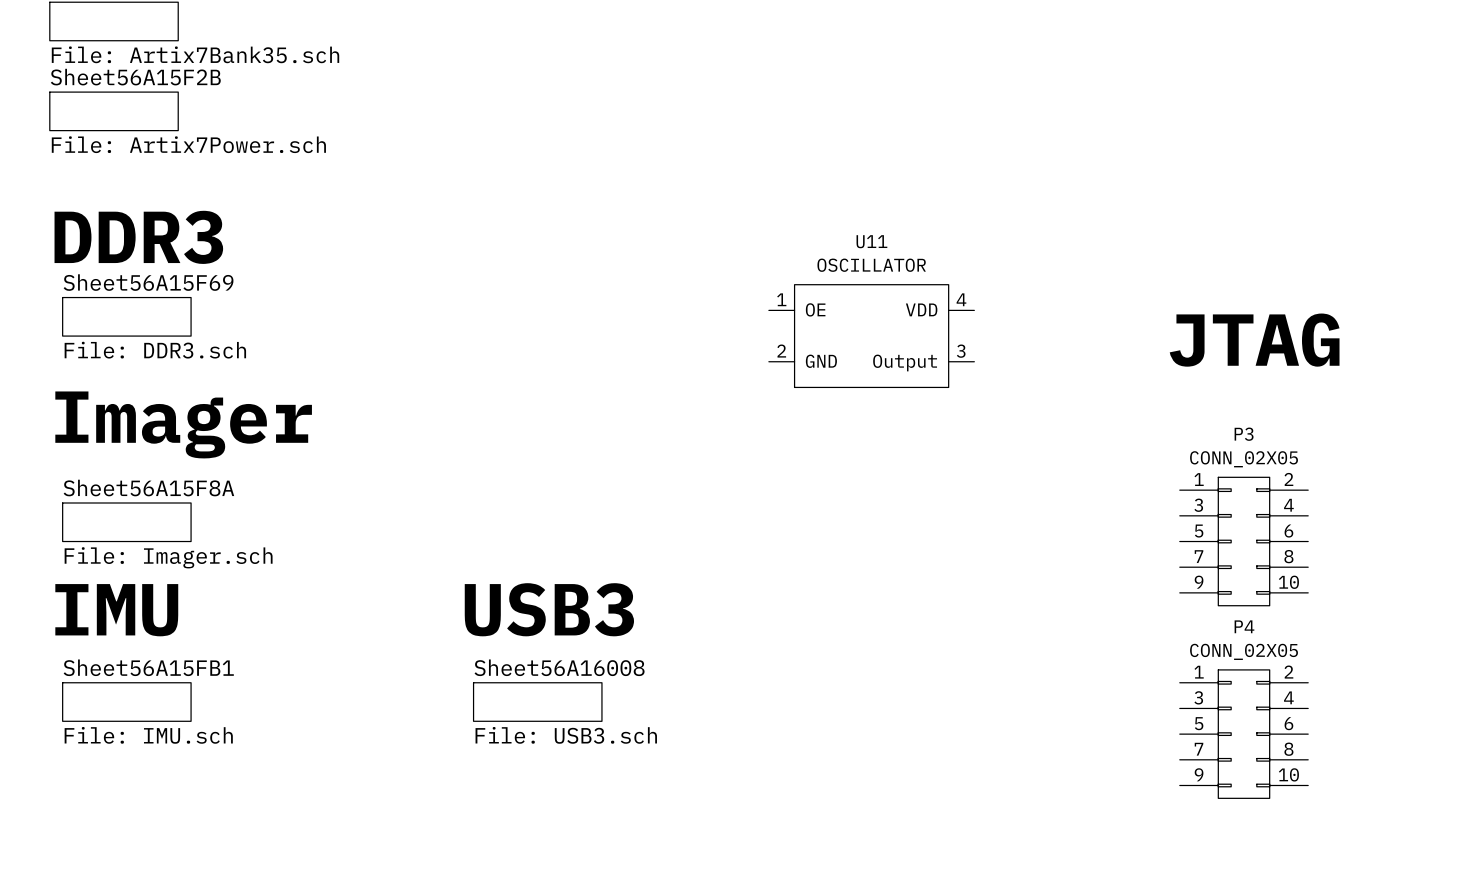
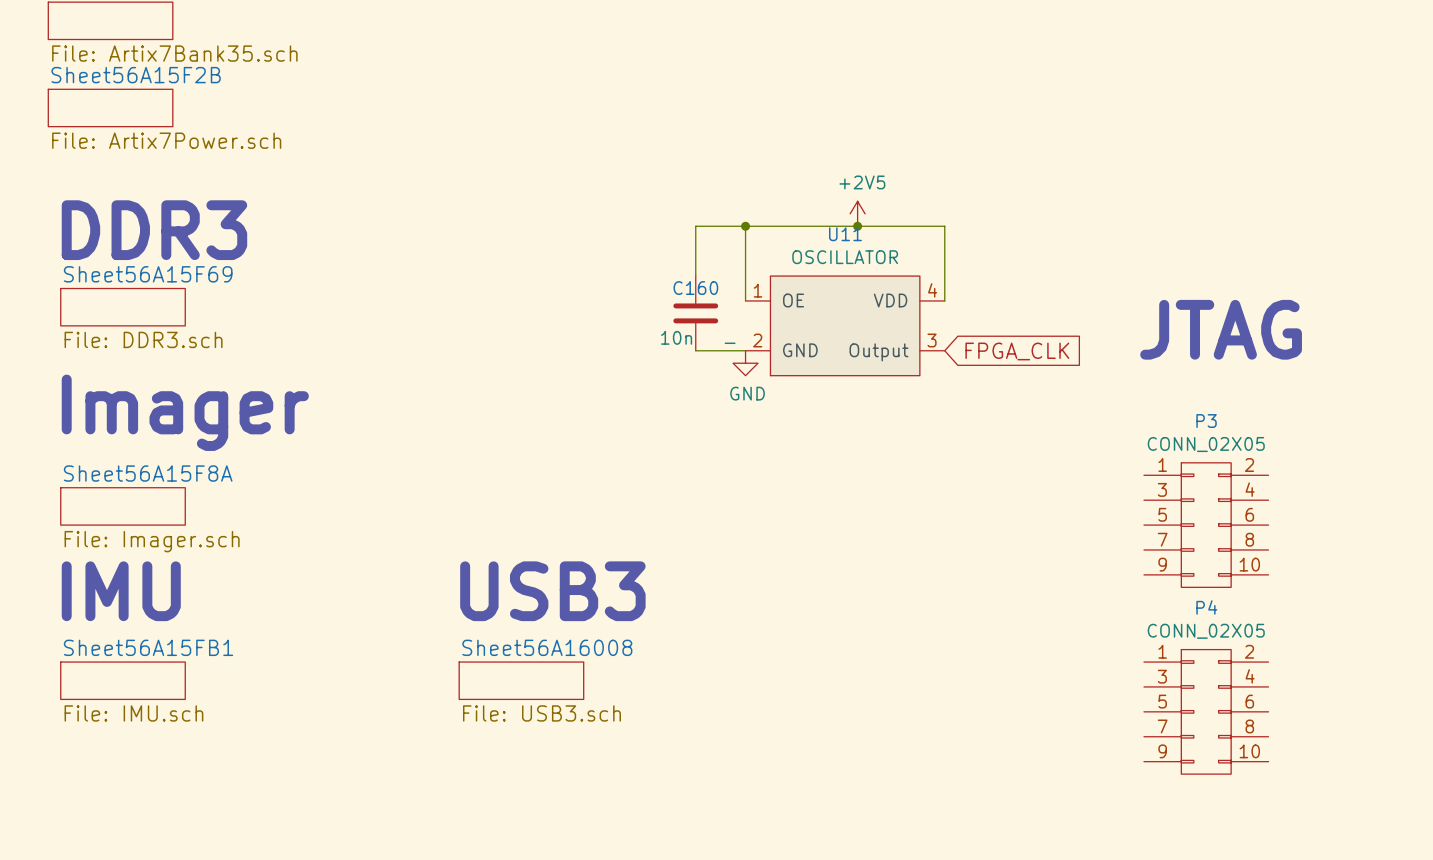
power symbol: none -> +2V5 (857, 213)
wire: none -> (745, 226) (745, 300)
junction: none -> (745, 226)
junction: none -> (857, 226)
wire: none -> (695, 276) (695, 226) (944, 226) (944, 300)
C160: none -> 10n (695, 313)
wire: none -> (695, 350) (745, 350)
global label: none -> FPGA_CLK (1017, 351)
power symbol: none -> GND (745, 363)

